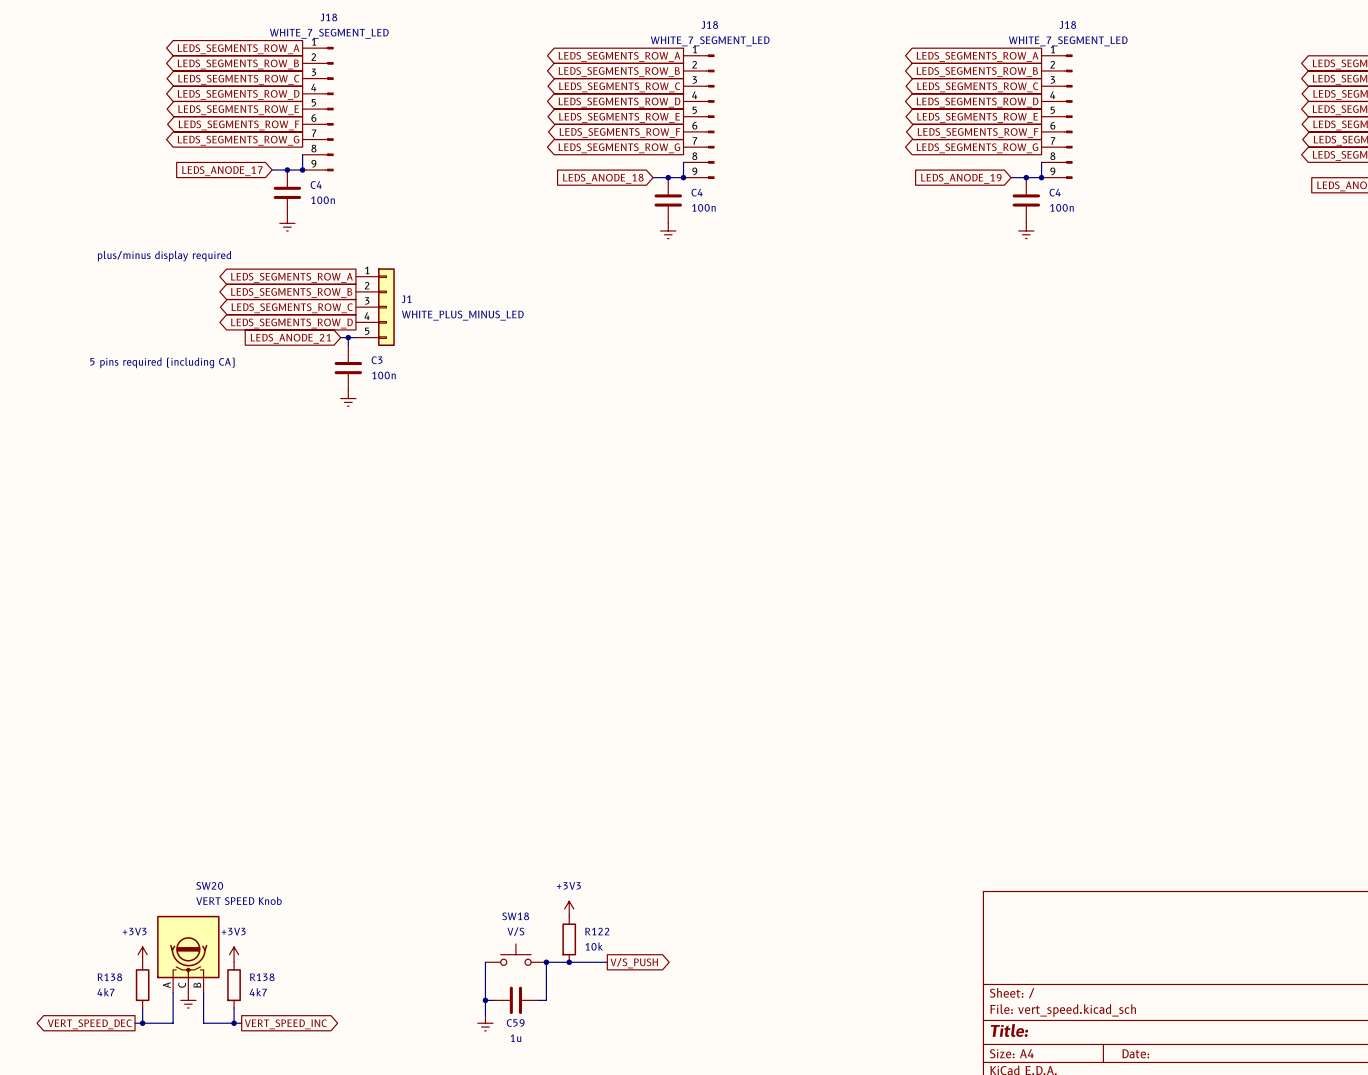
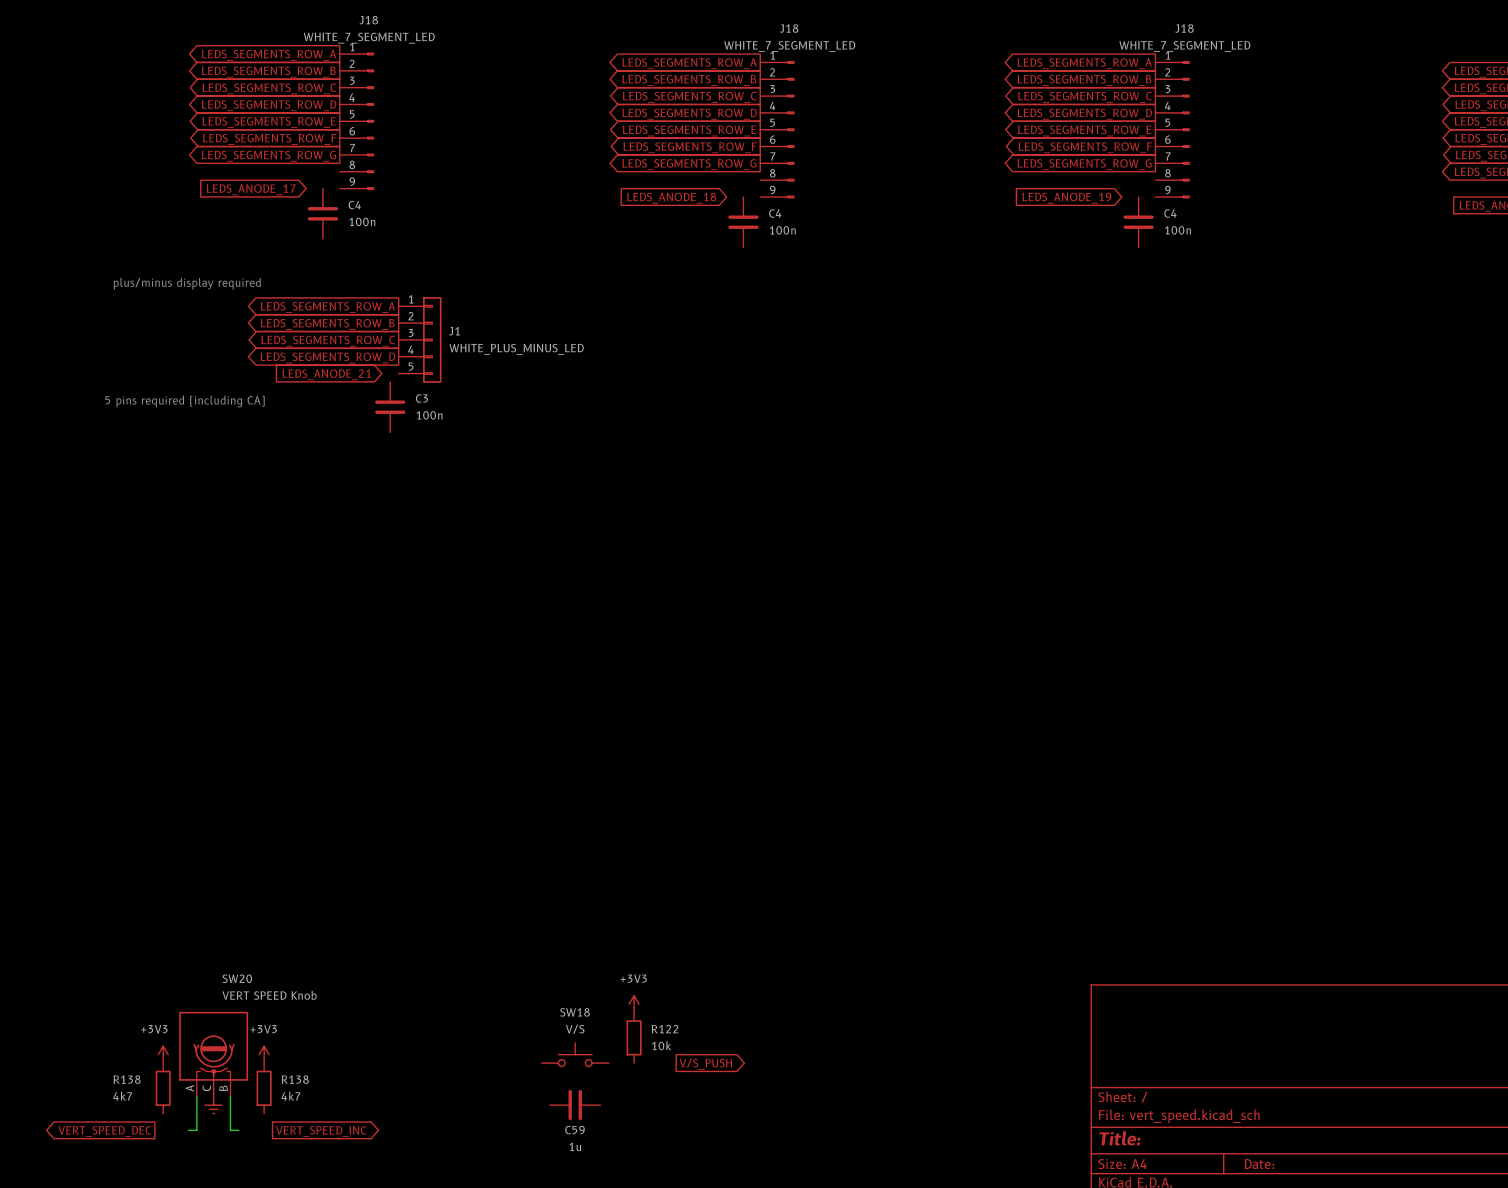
wire: (302, 154) (302, 170) (272, 170) -> none
wire: (683, 162) (683, 177) (653, 177) -> none
wire: (1041, 162) (1041, 177) (1011, 177) -> none
junction: (287, 170) -> none
junction: (302, 170) -> none
junction: (668, 177) -> none
junction: (683, 177) -> none
junction: (1026, 177) -> none
junction: (1041, 177) -> none
power symbol: (287, 223) -> none
power symbol: (668, 230) -> none
power symbol: (1026, 230) -> none
wire: (340, 337) (355, 337) -> none
wire: (348, 337) (348, 345) -> none
junction: (348, 337) -> none
power symbol: (348, 398) -> none
wire: (485, 962) (485, 1015) -> none
junction: (546, 962) -> none
junction: (569, 962) -> none
wire: (607, 962) (546, 962) (546, 1000) (538, 1000) -> none
wire: (485, 1000) (493, 1000) -> none
junction: (485, 1000) -> none
wire: (142, 1007) (142, 1023) -> none
wire: (234, 1007) (234, 1023) -> none
wire: (135, 1023) (165, 1023) -> none
junction: (142, 1023) -> none
wire: (211, 1023) (241, 1023) -> none
junction: (234, 1023) -> none
power symbol: (485, 1023) -> none

